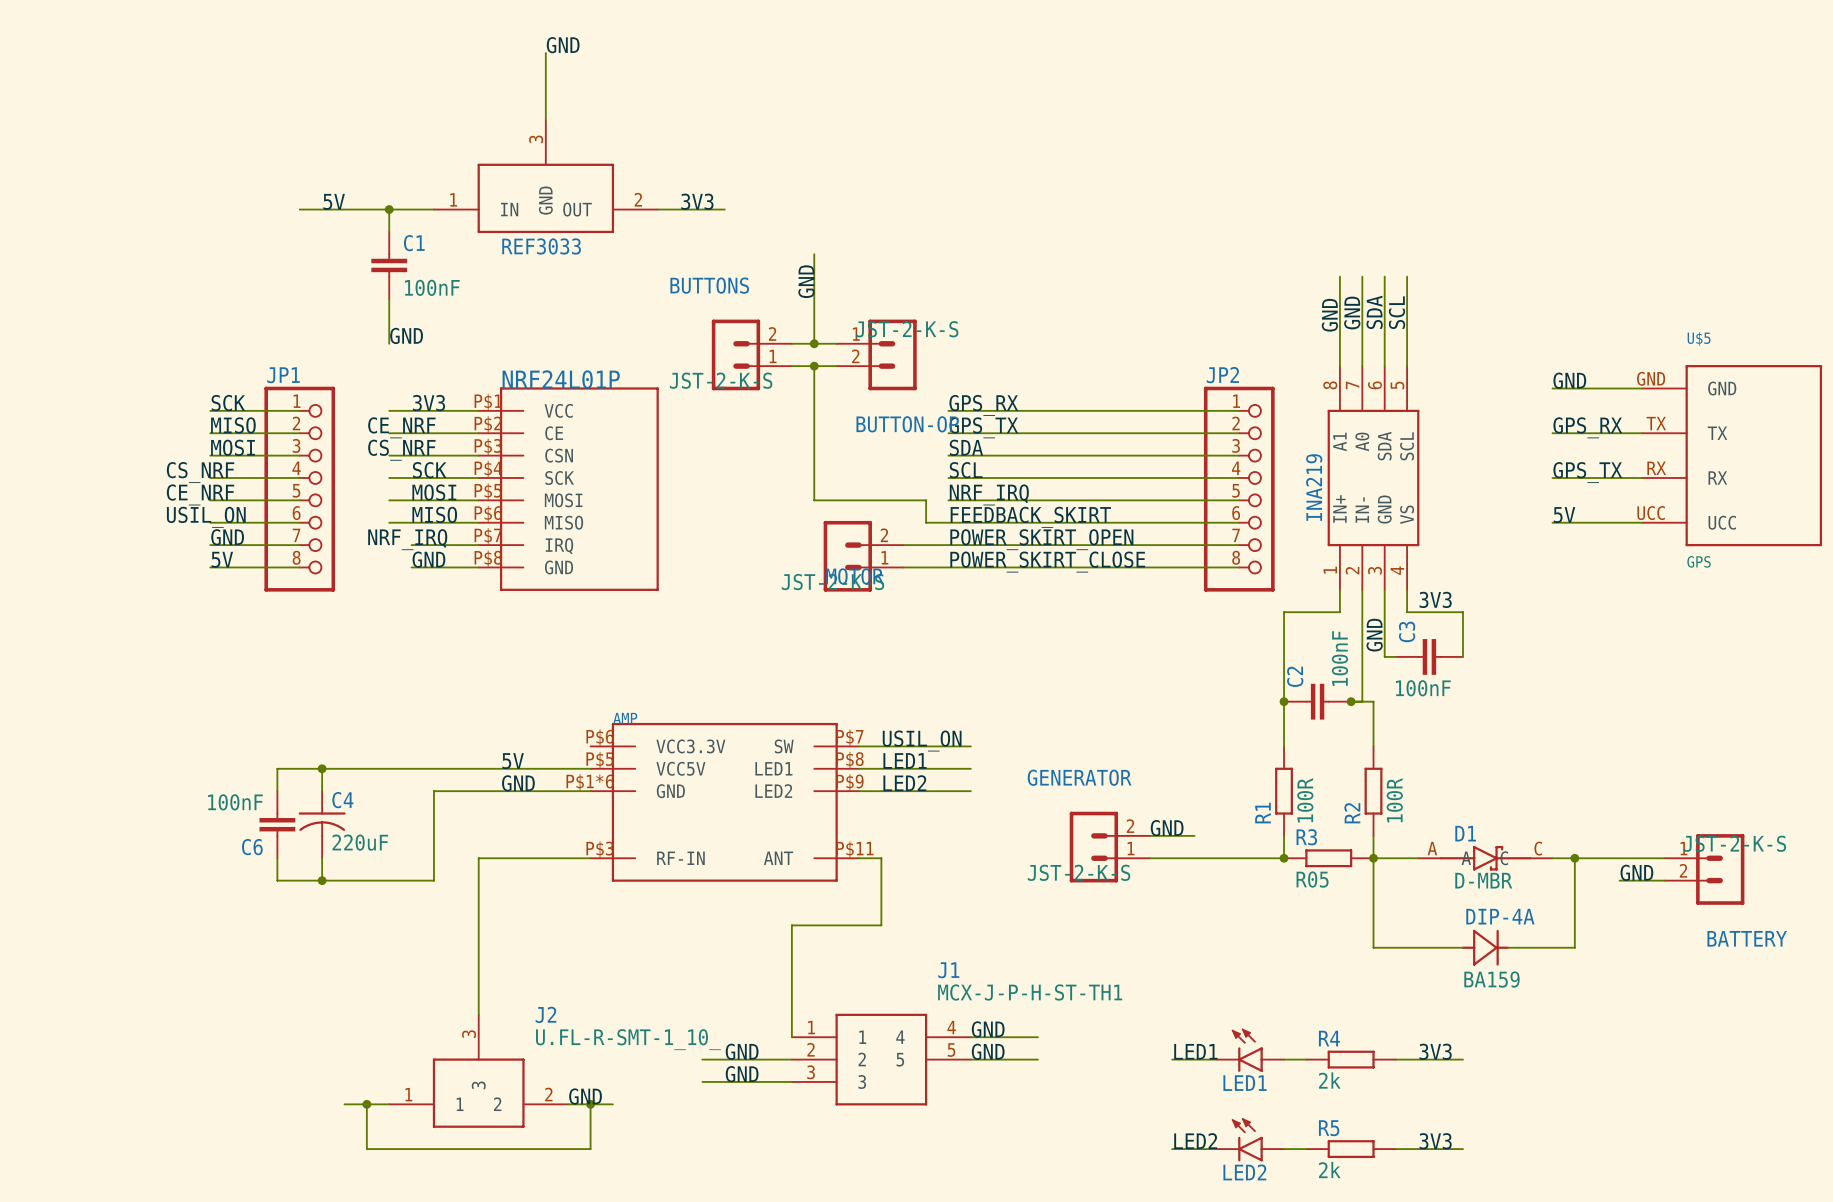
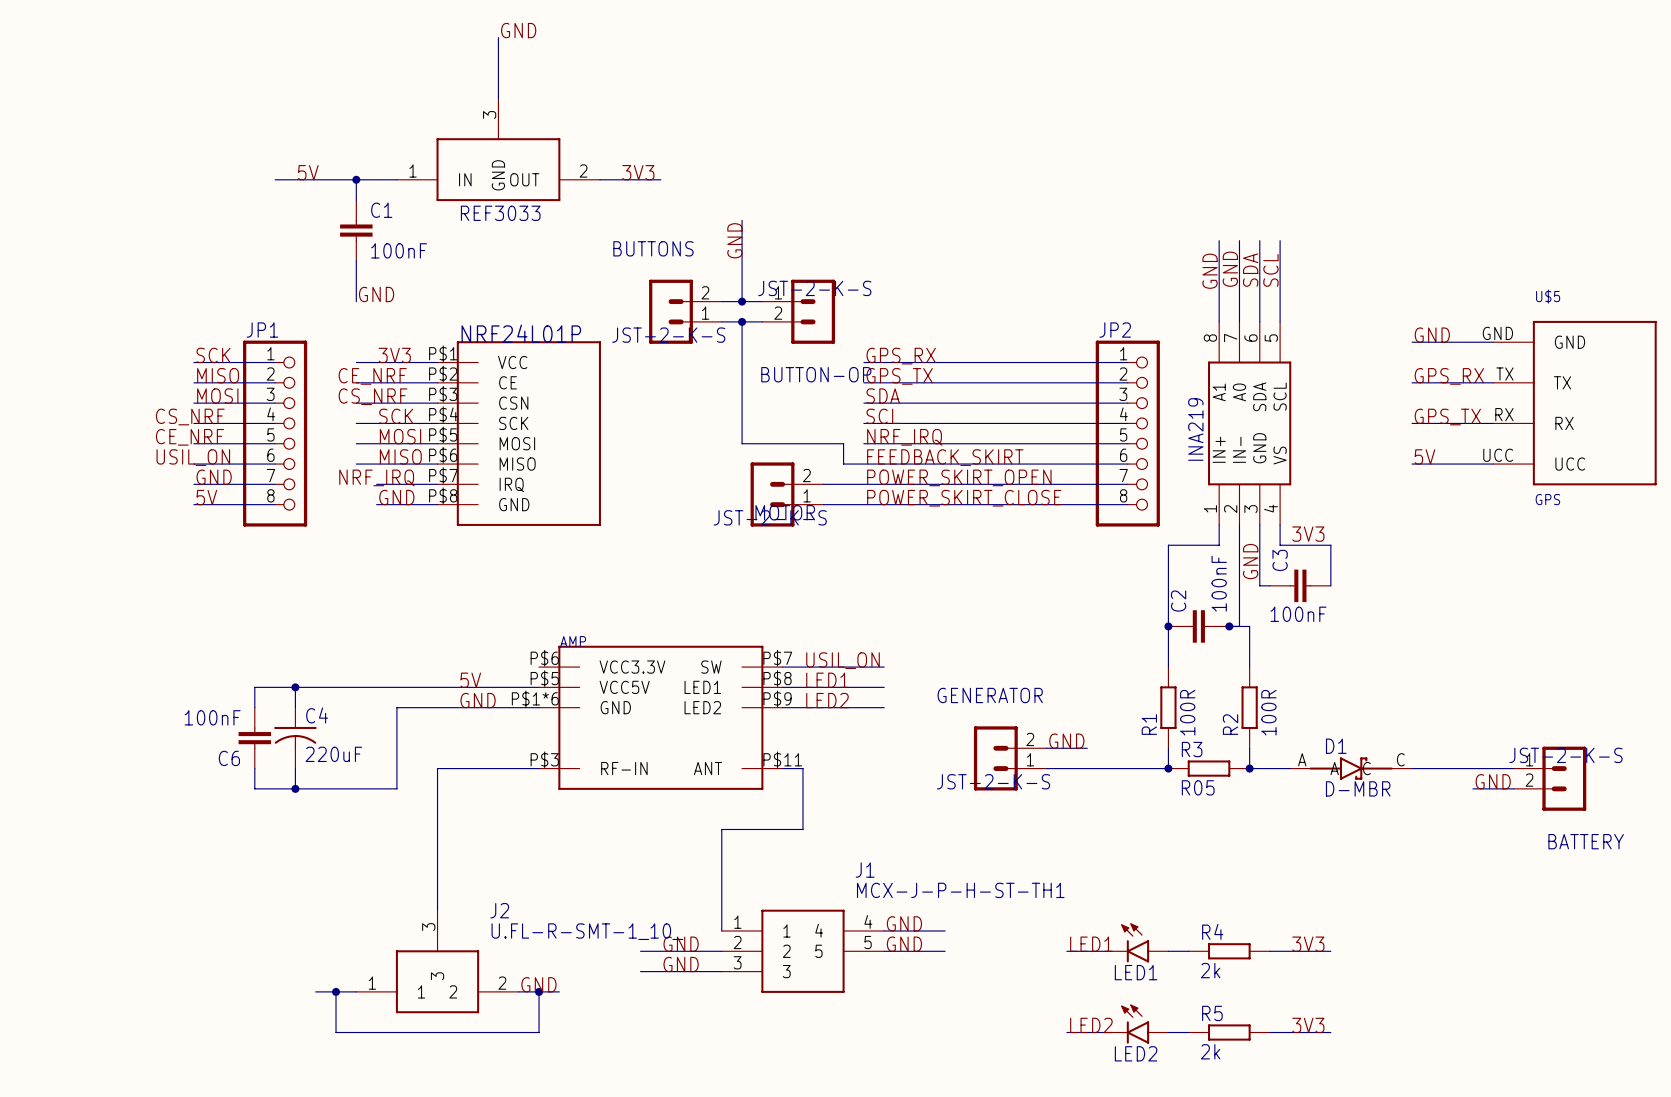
wire: (1373, 858) (1373, 947) (1462, 947) -> none
wire: (1574, 858) (1574, 947) (1507, 947) -> none
junction: (1574, 858) -> none
DIP-4A: BA159 (1485, 947) -> none

